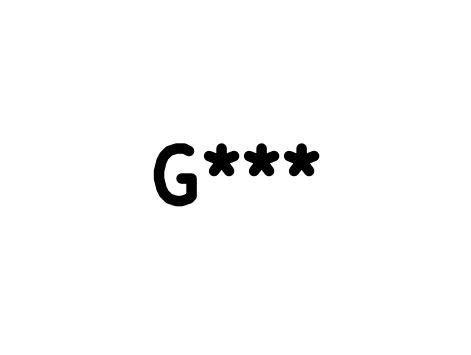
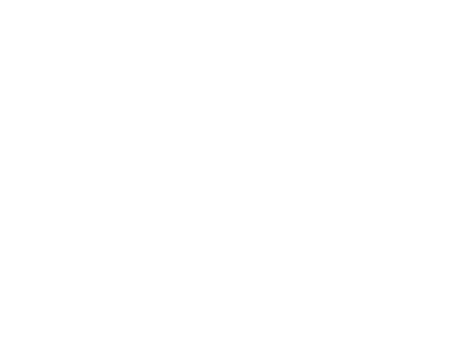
G***: (236, 174) -> none

